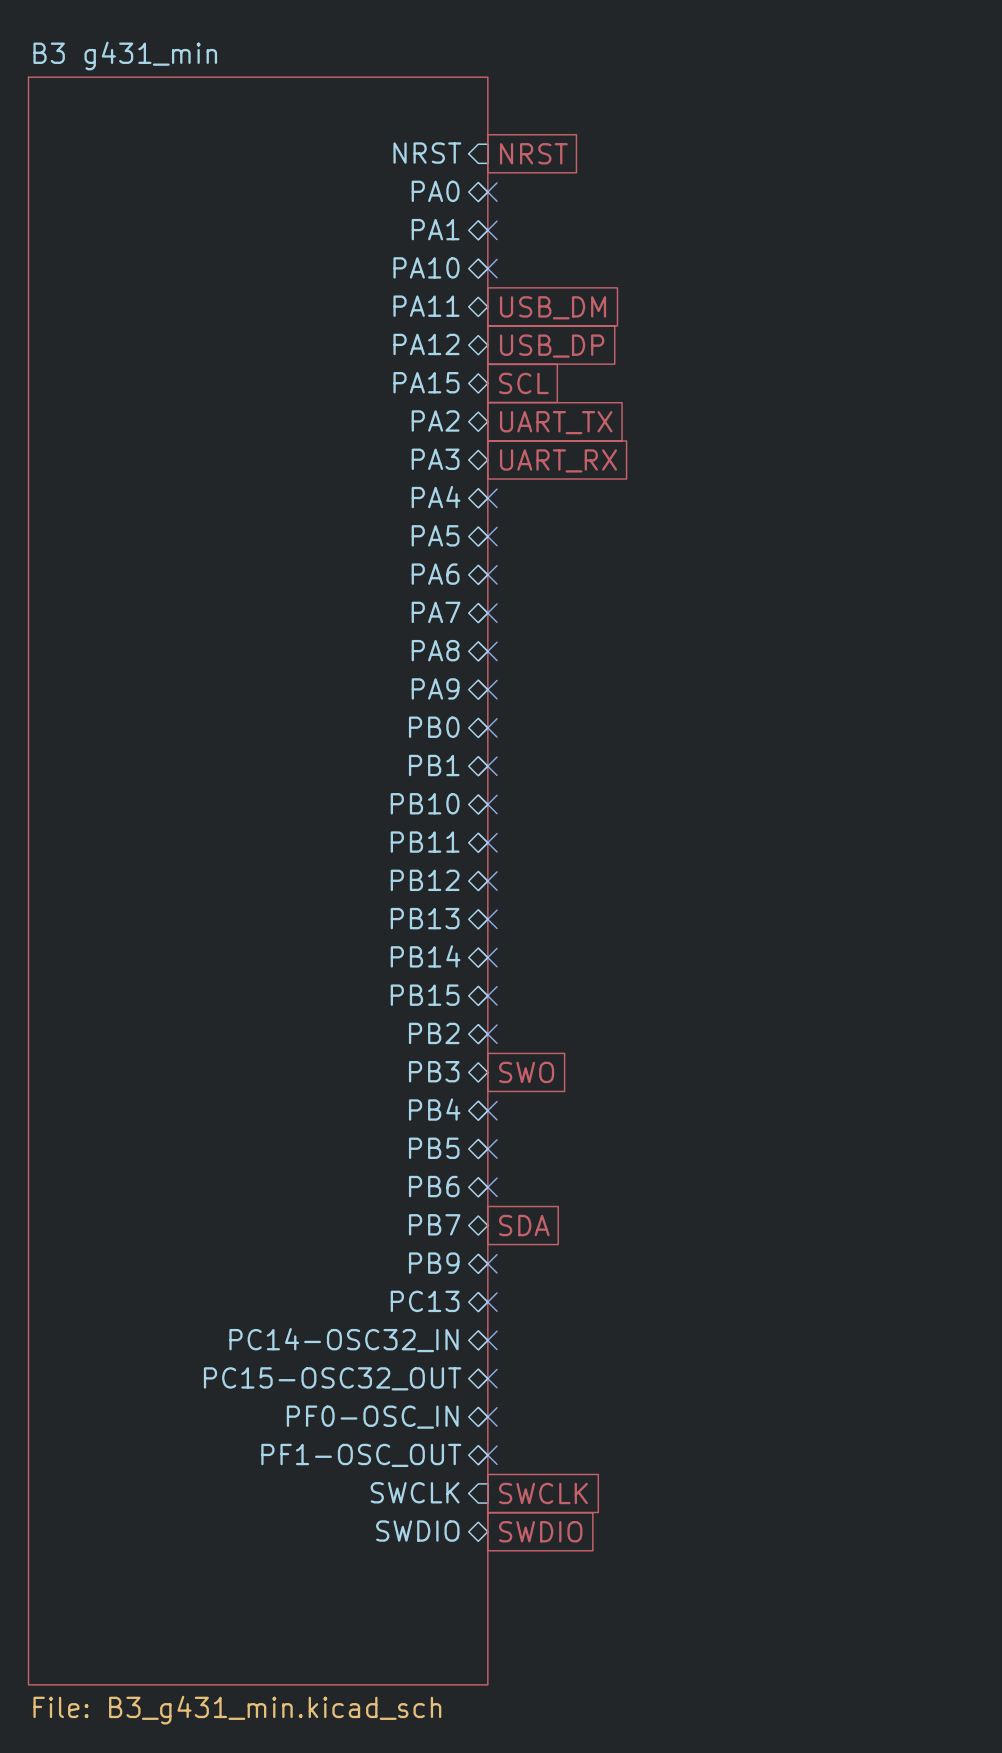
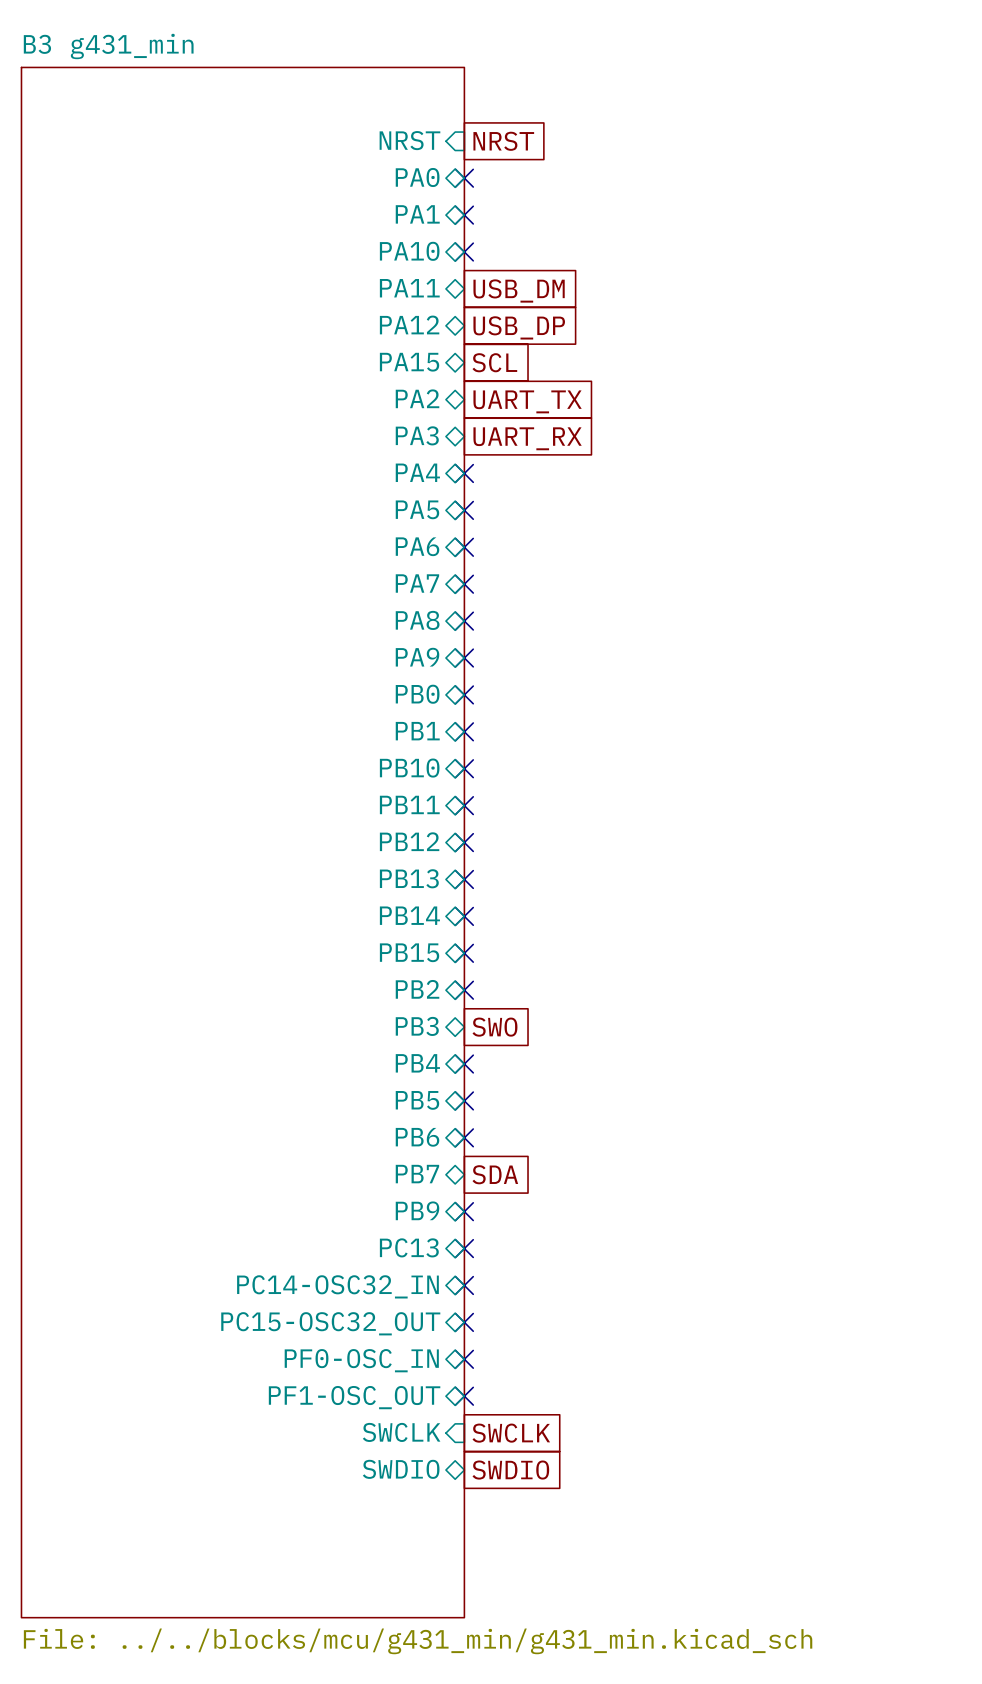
sheet B3 g431_min value: File: B3_g431_min.kicad_sch (237, 1710) -> File: ../../blocks/mcu/g431_min/g431_min.kicad_sch (418, 1641)

